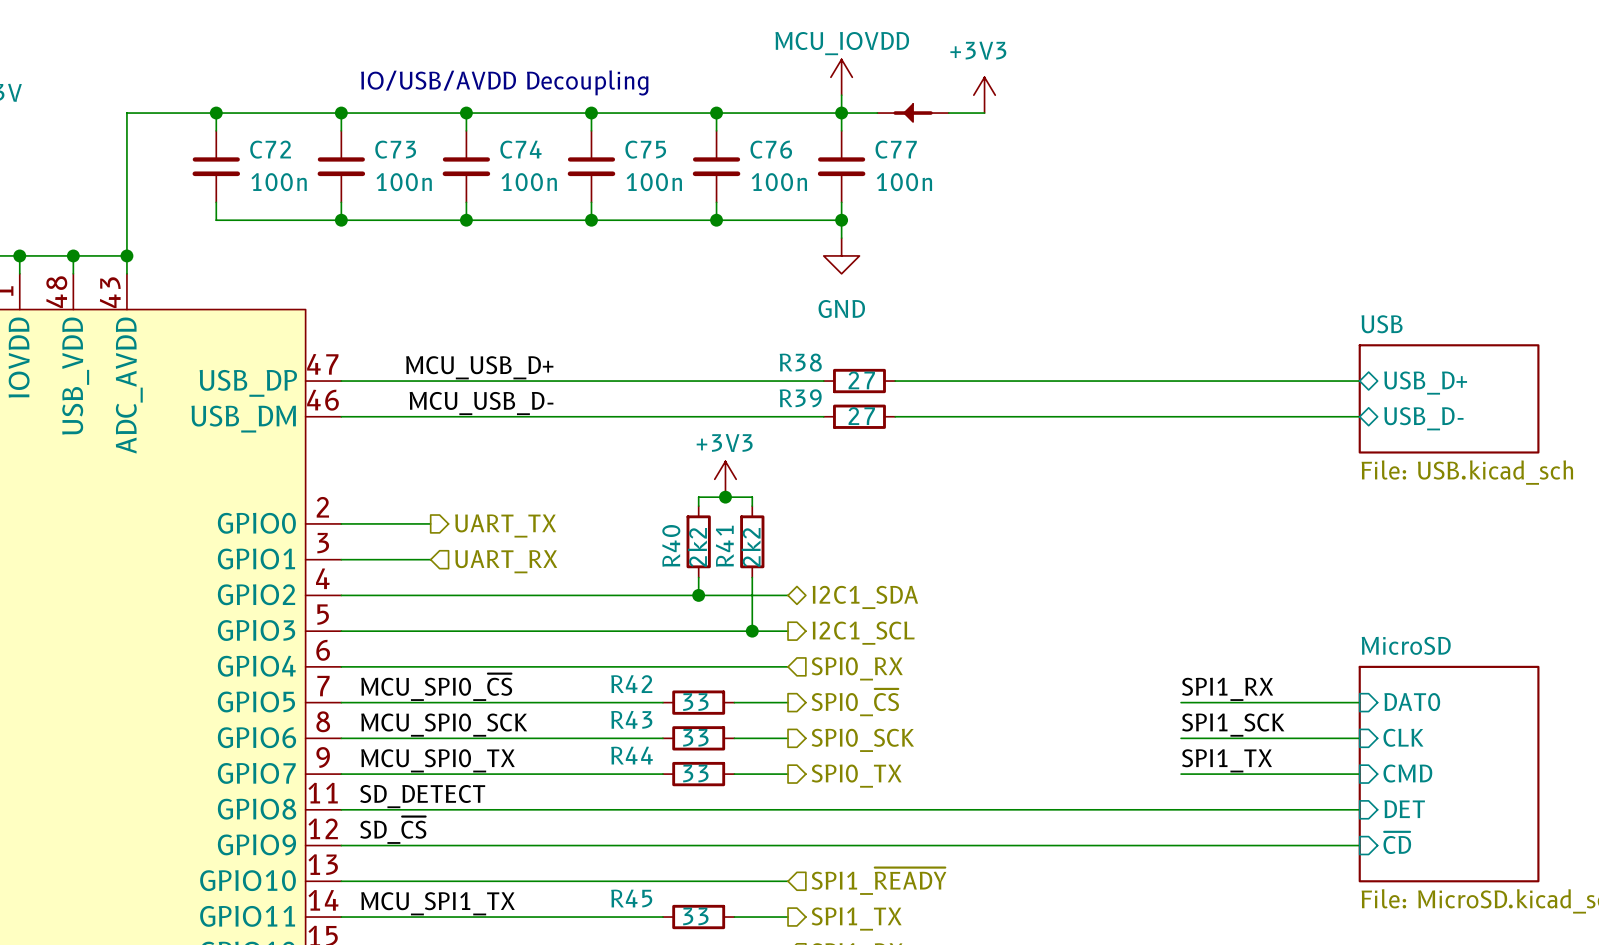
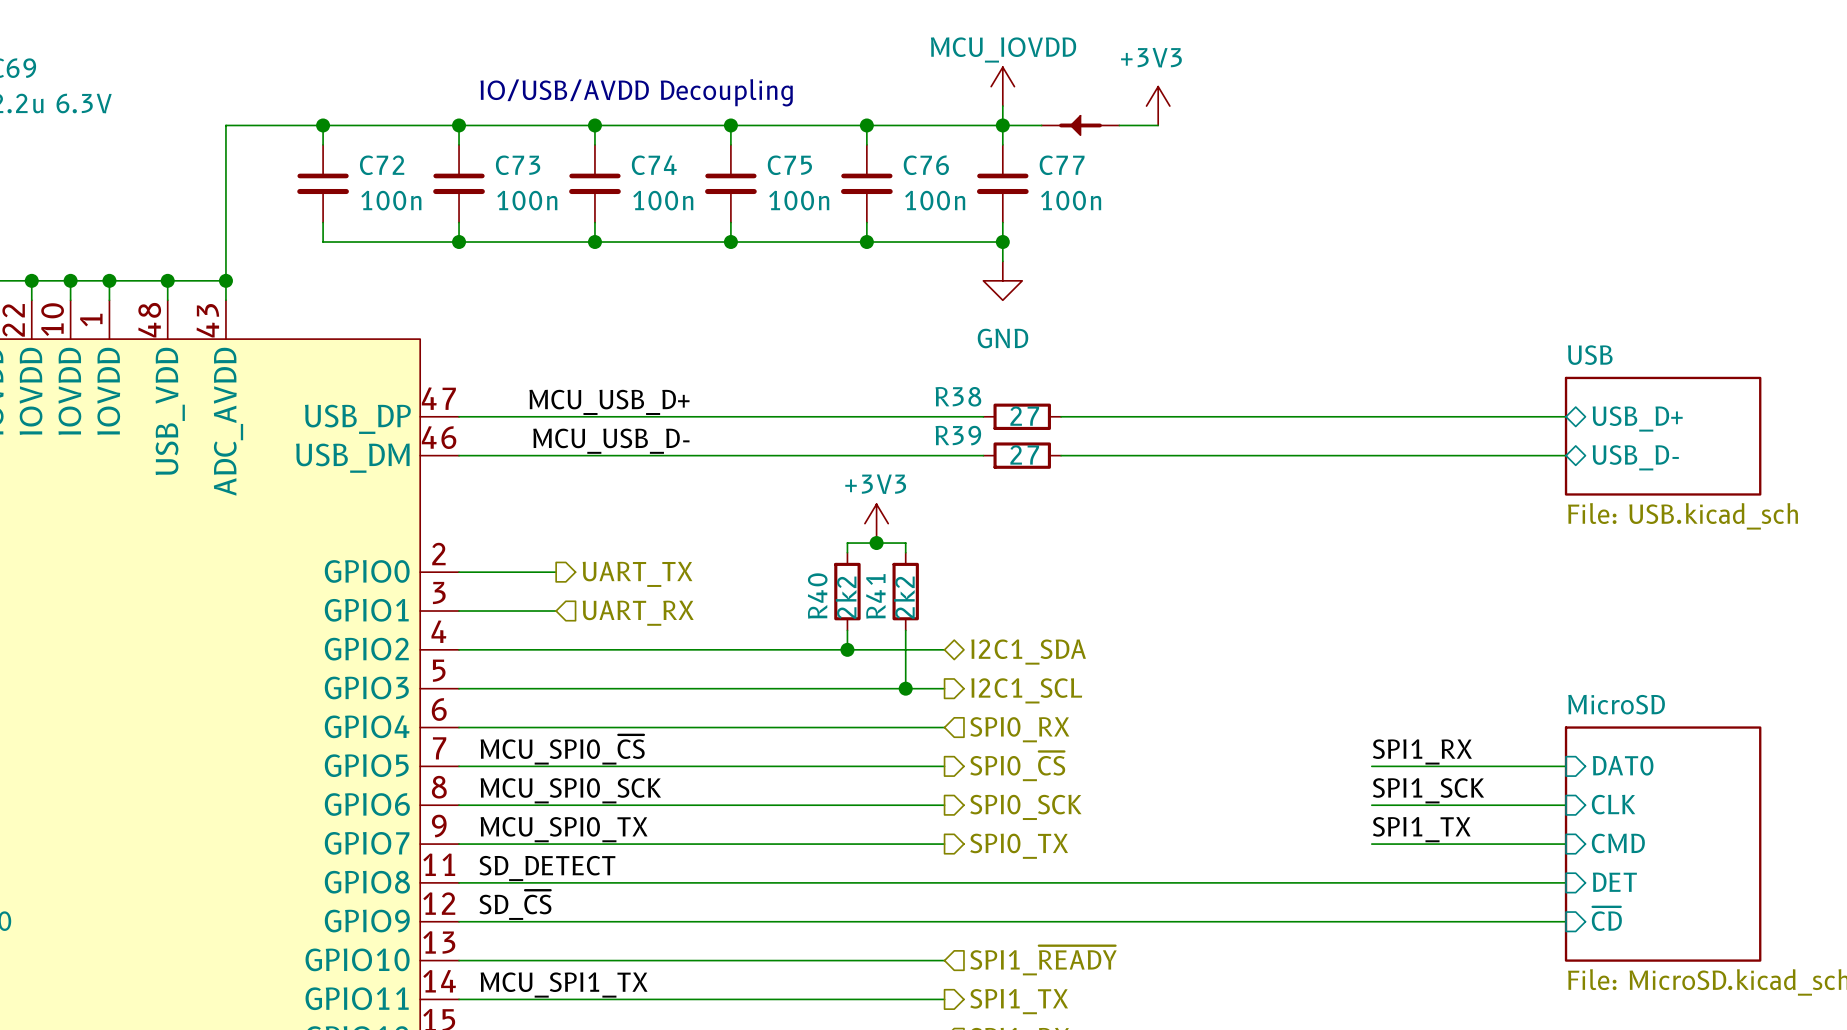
wire: none -> (808, 766) (886, 766)
R42: 33 (698, 702) -> none
wire: none -> (808, 805) (886, 805)
R43: 33 (698, 738) -> none
wire: none -> (808, 844) (886, 844)
R44: 33 (698, 774) -> none
wire: none -> (808, 999) (886, 999)
R45: 33 (698, 917) -> none

